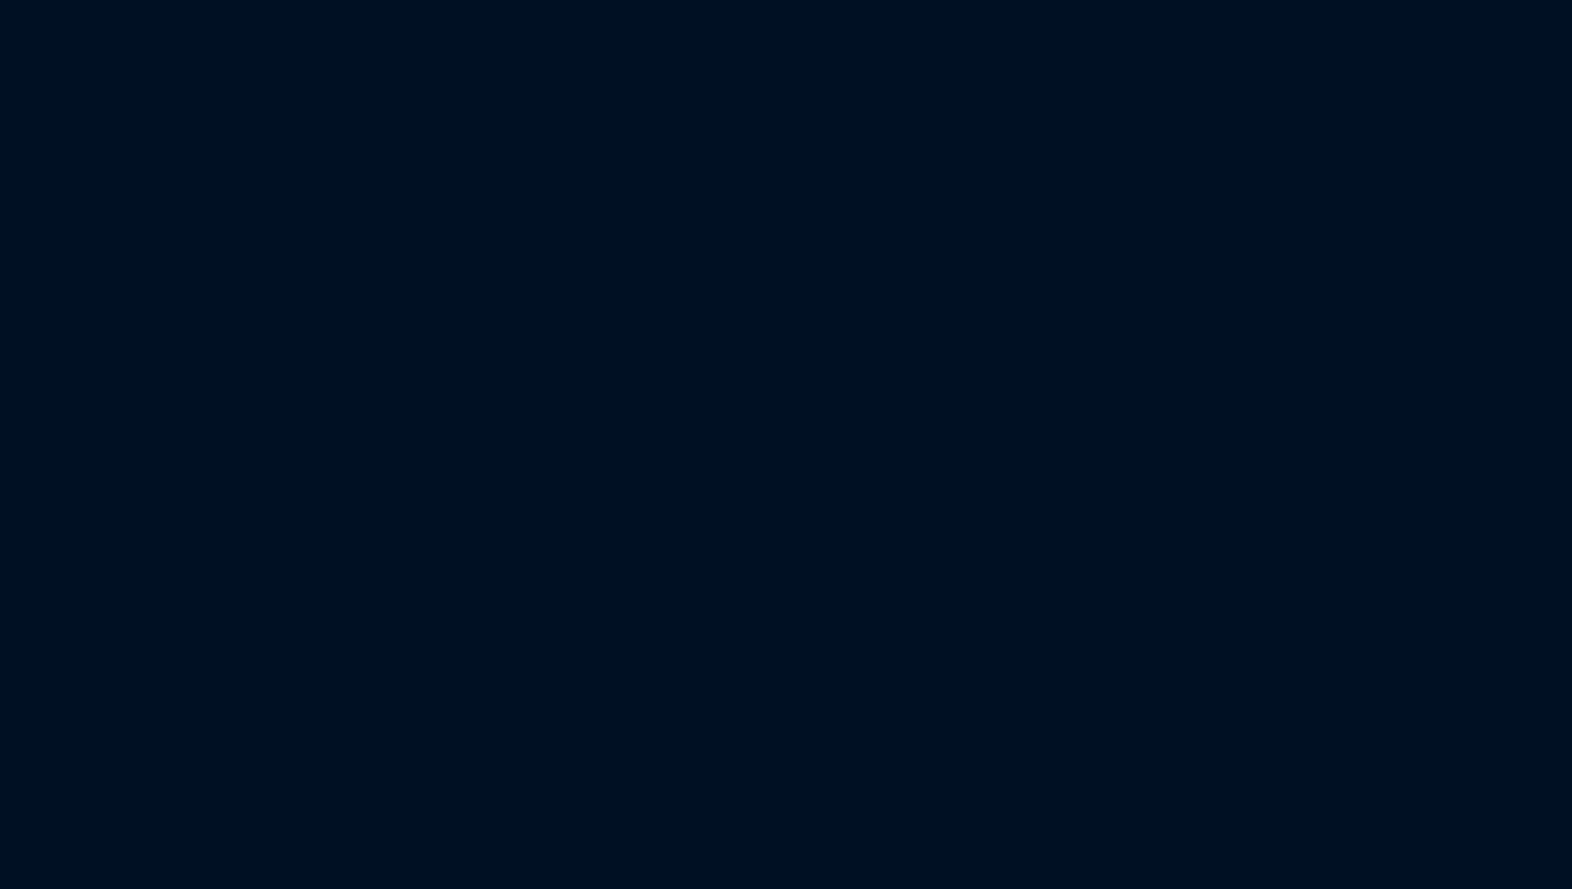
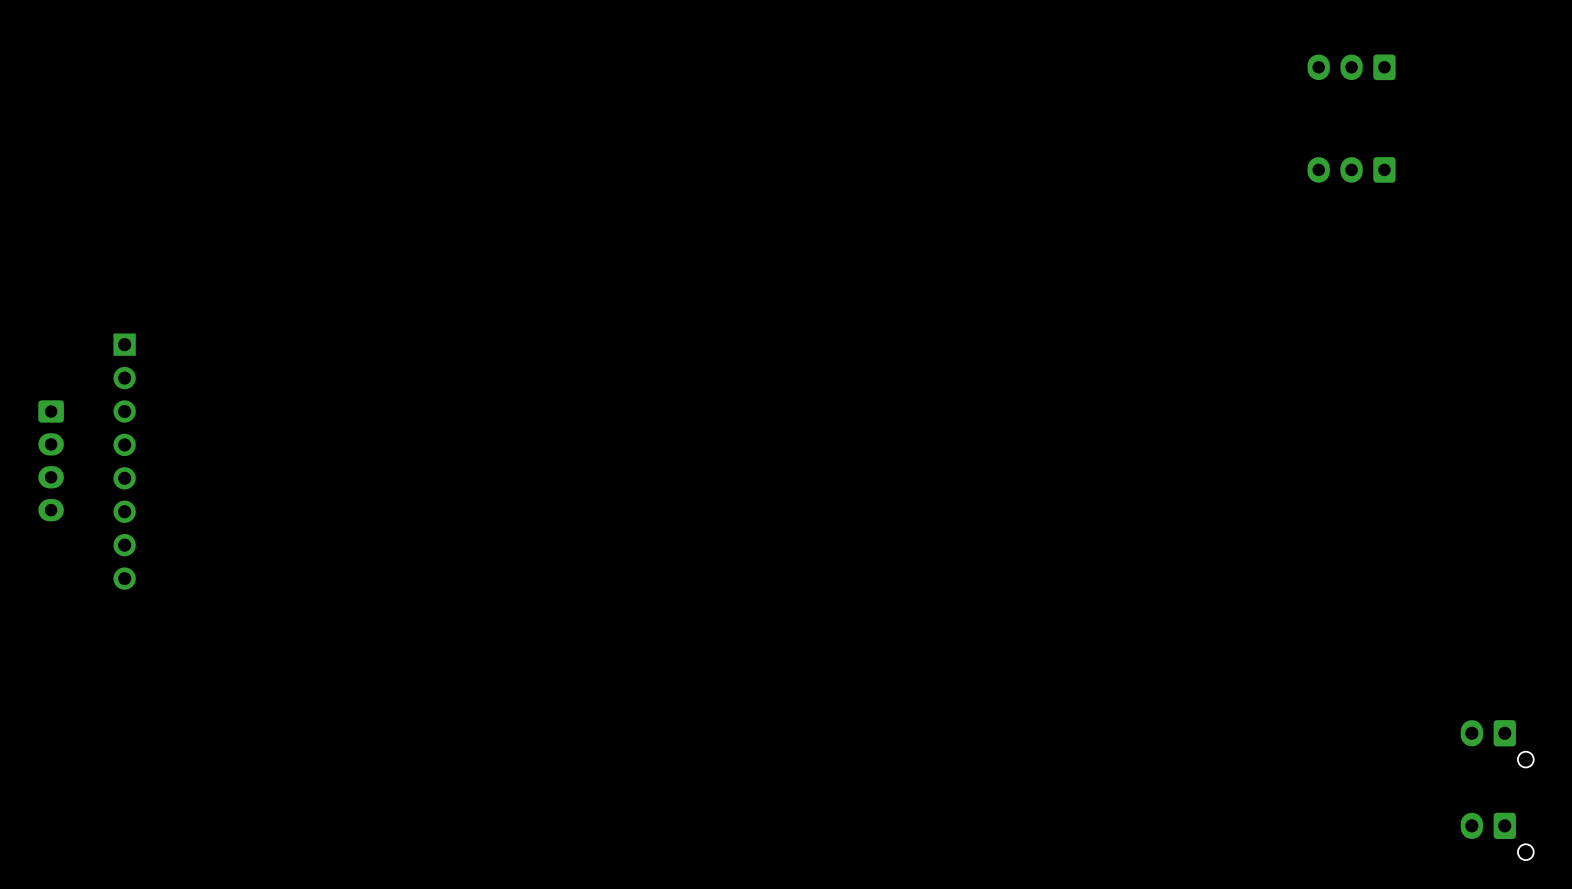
part: none -> (1351, 67)
part: none -> (1351, 169)
part: none -> (51, 460)
part: none -> (124, 461)
part: none -> (1497, 743)
part: none -> (1497, 836)

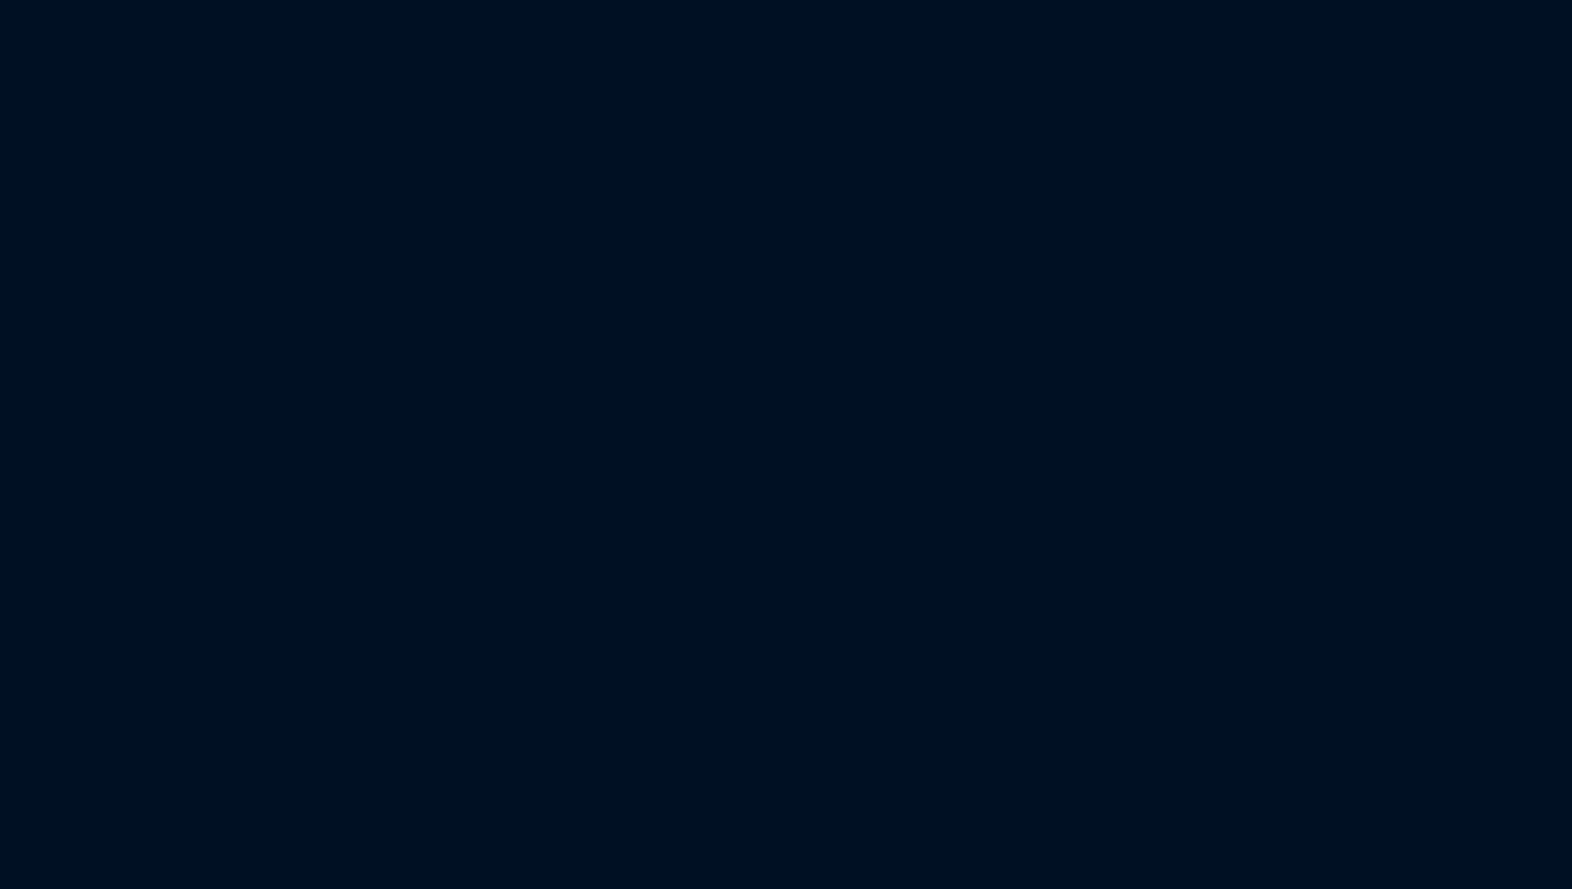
part: (1351, 67) -> none
part: (1351, 169) -> none
part: (51, 460) -> none
part: (124, 461) -> none
part: (1497, 743) -> none
part: (1497, 836) -> none

